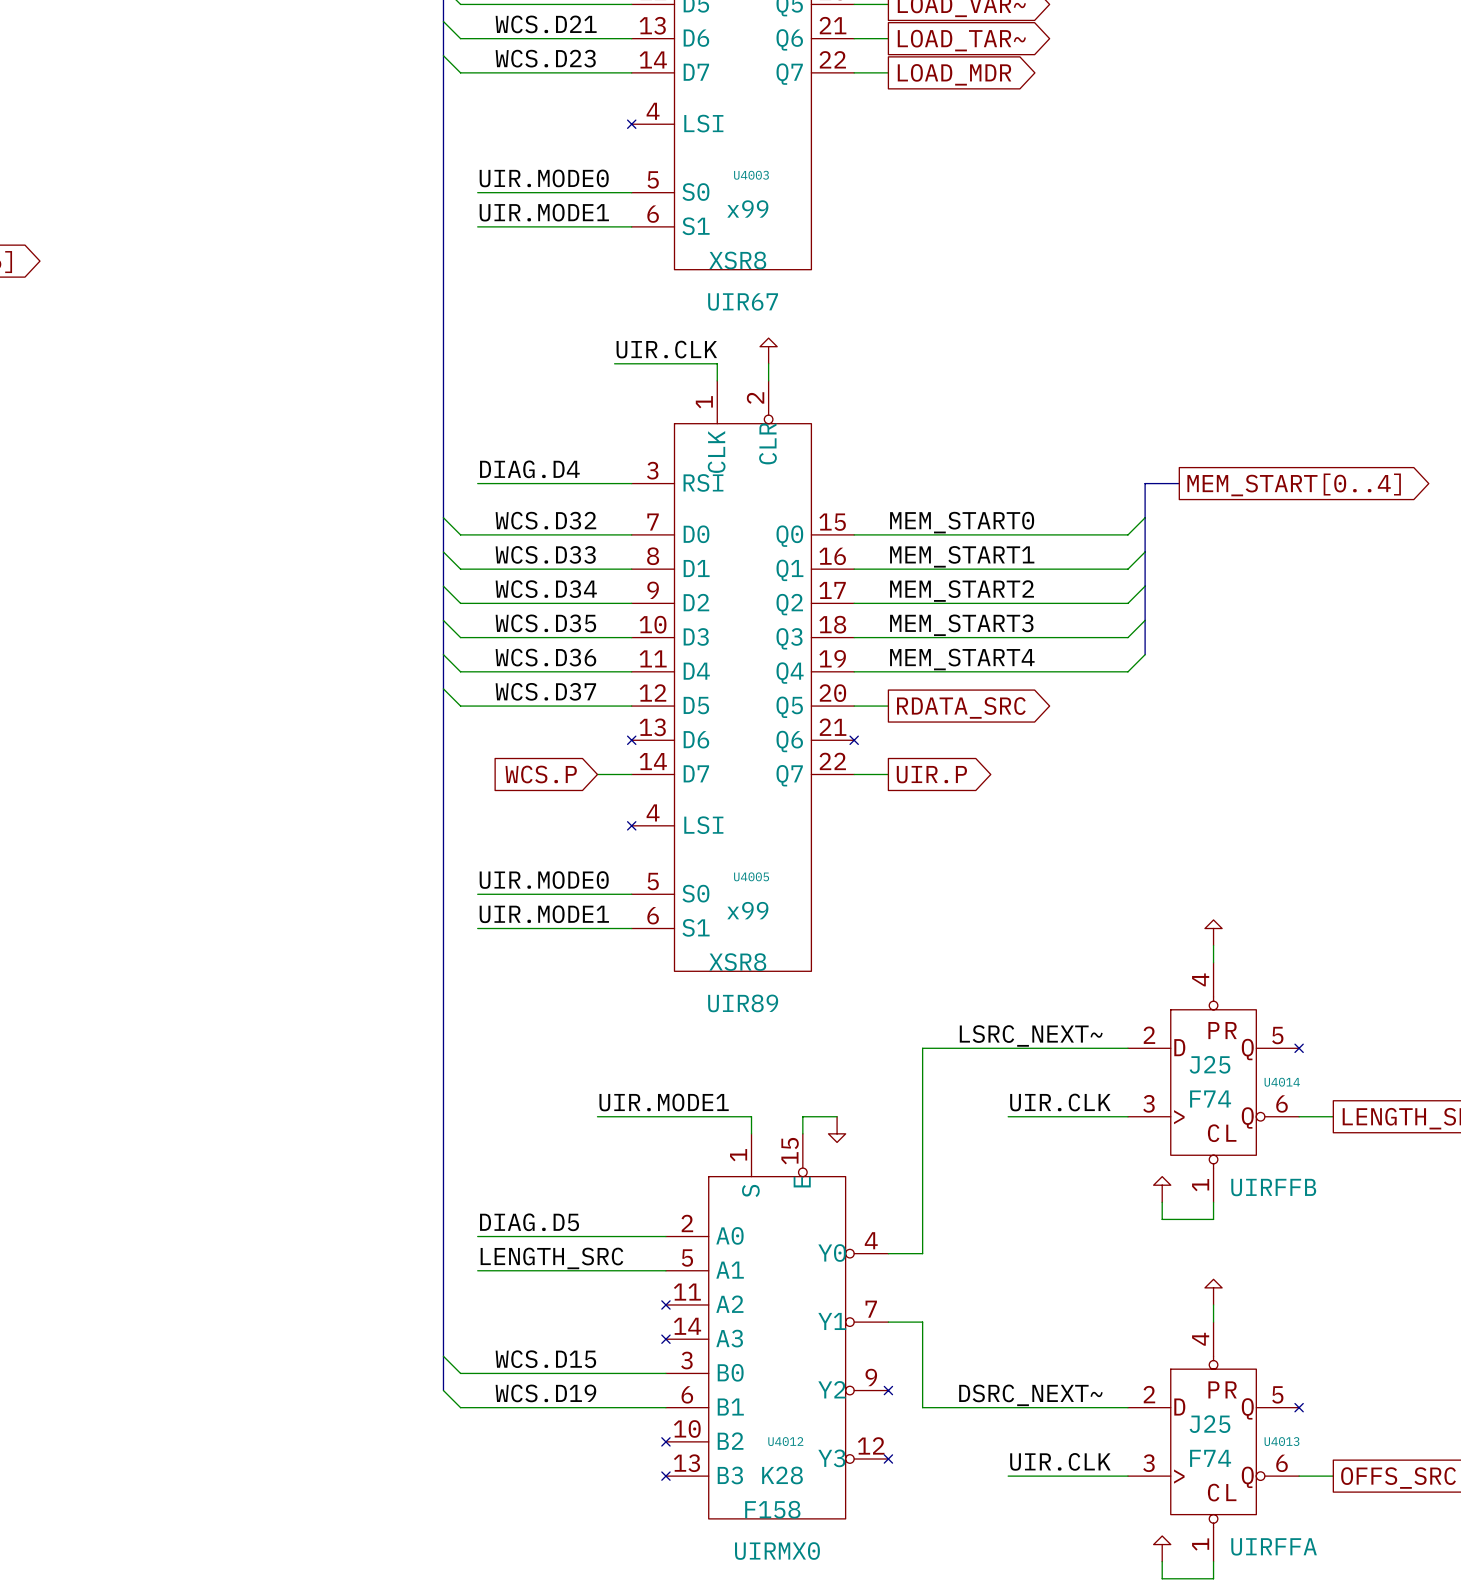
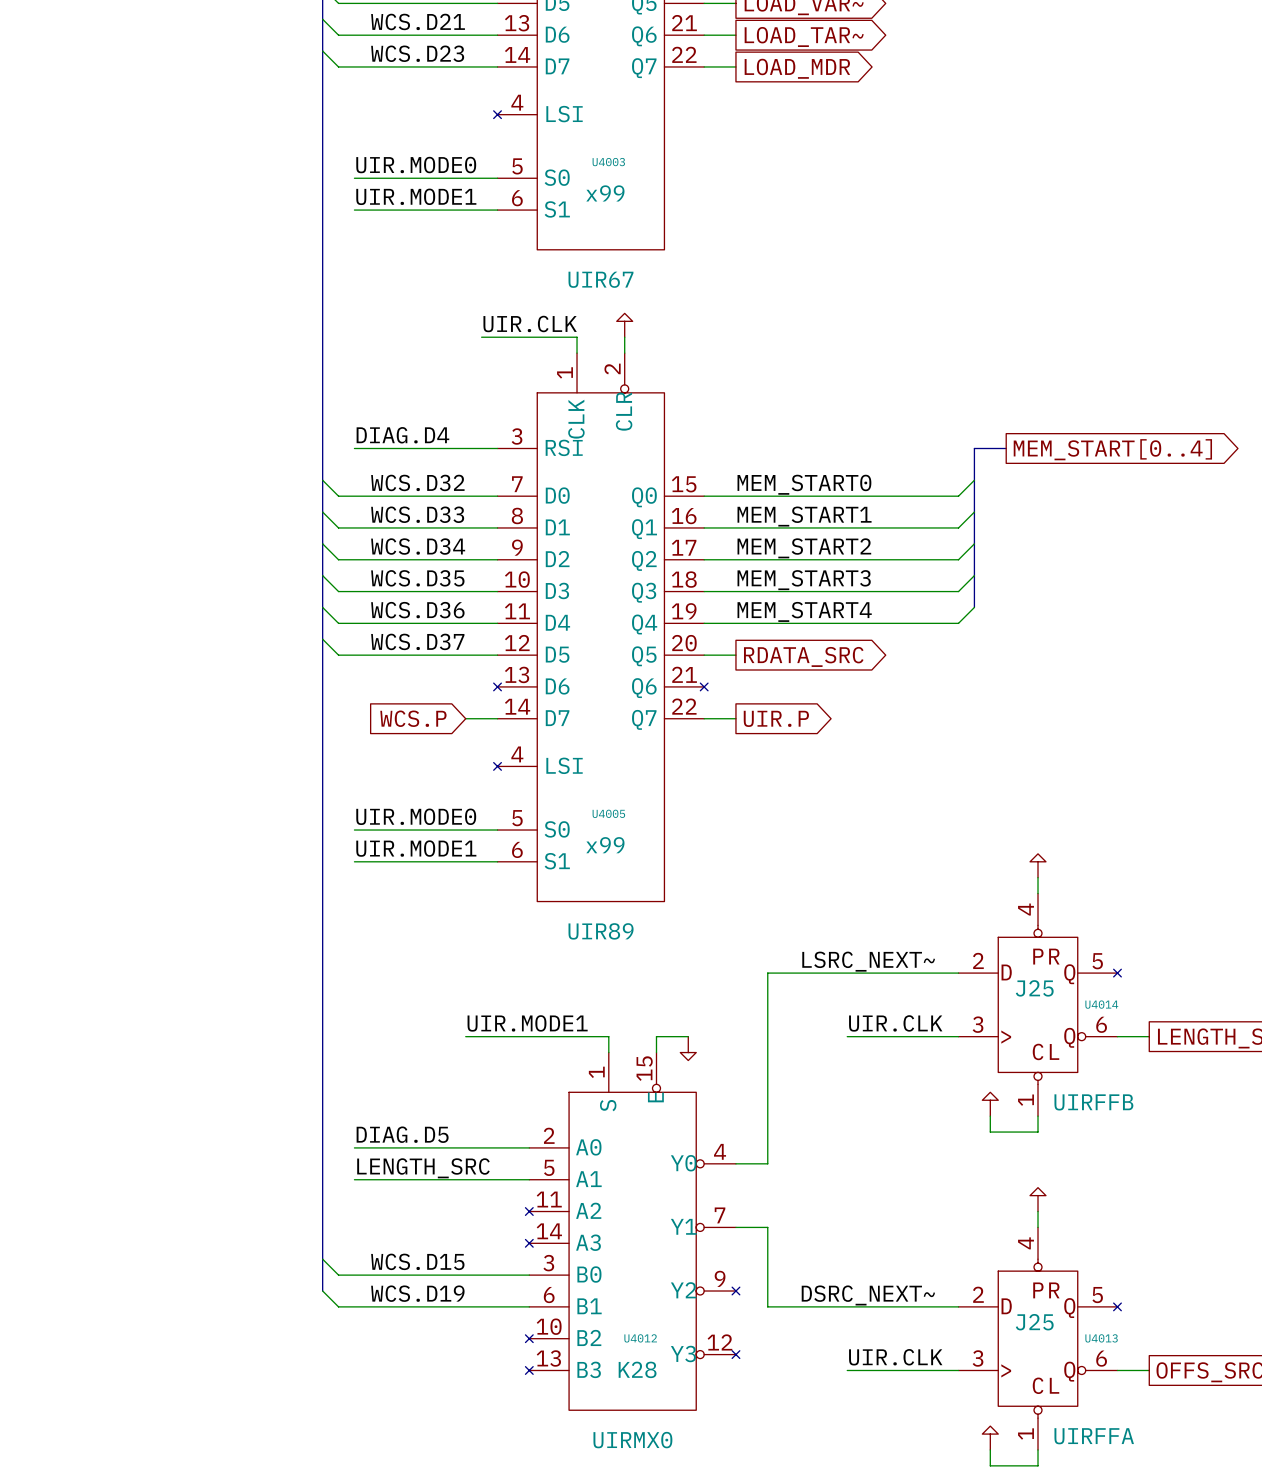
U4003 value: XSR8 (737, 260) -> none
U4005 value: XSR8 (737, 962) -> none
U4014 value: F74 (1210, 1098) -> none
U4013 value: F74 (1210, 1458) -> none
U4012 value: F158 (772, 1509) -> none

